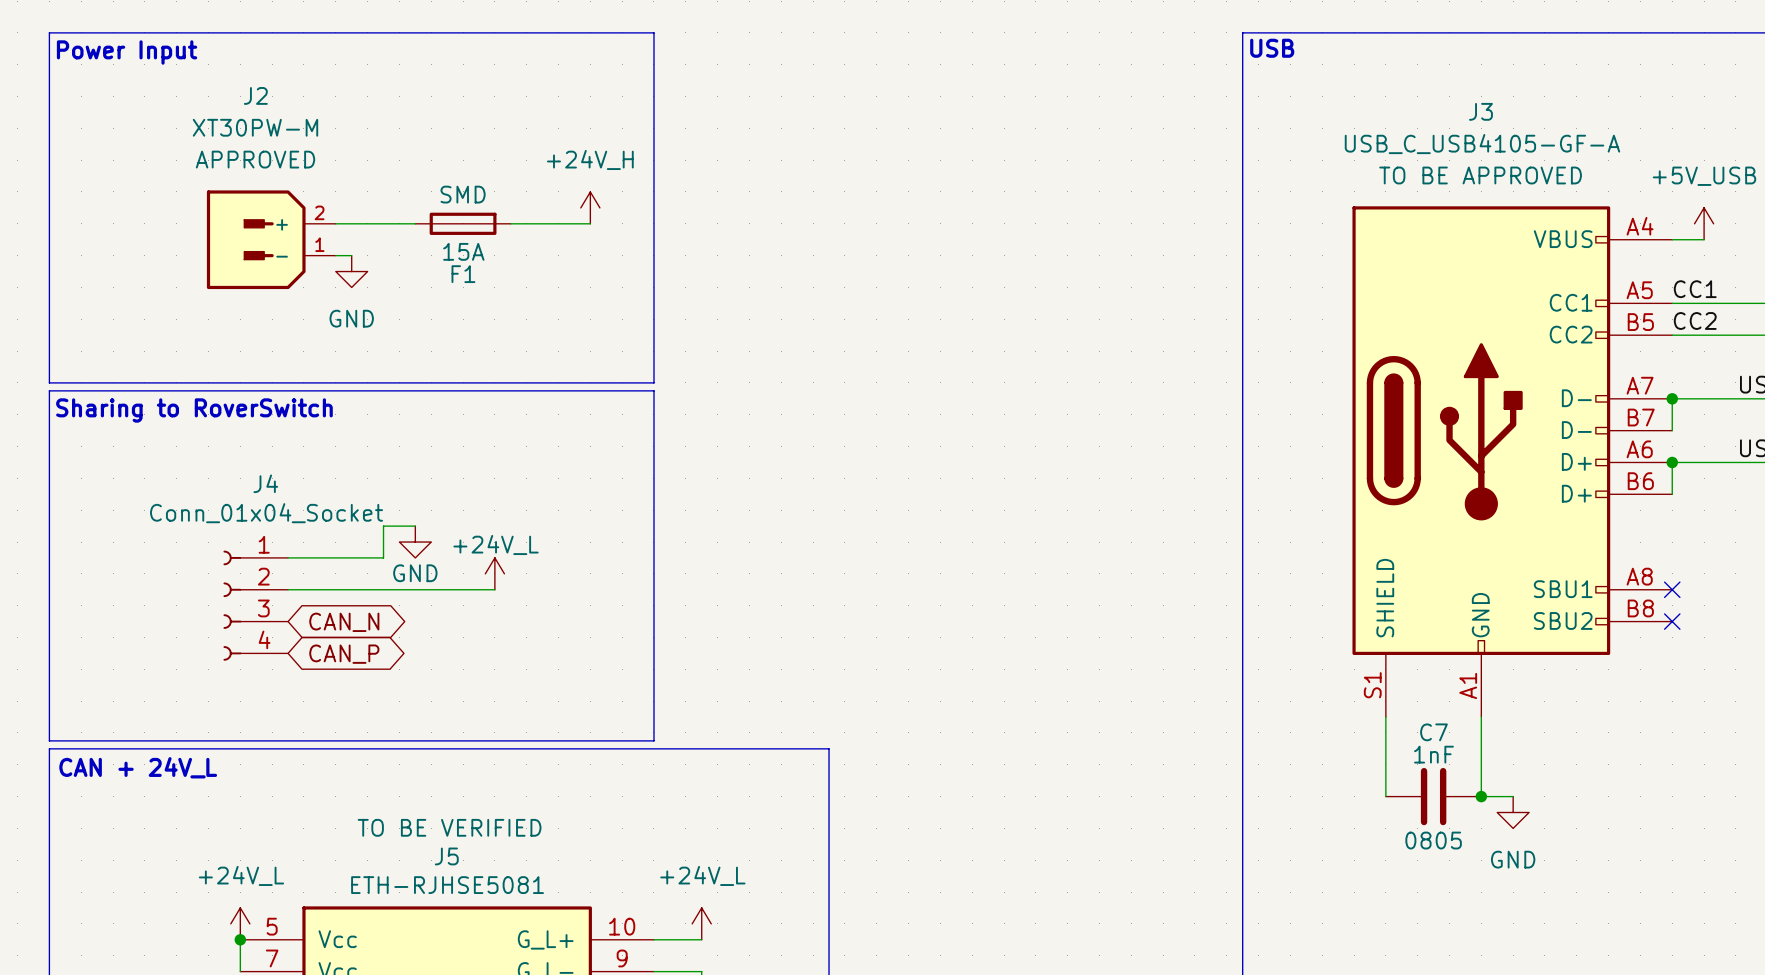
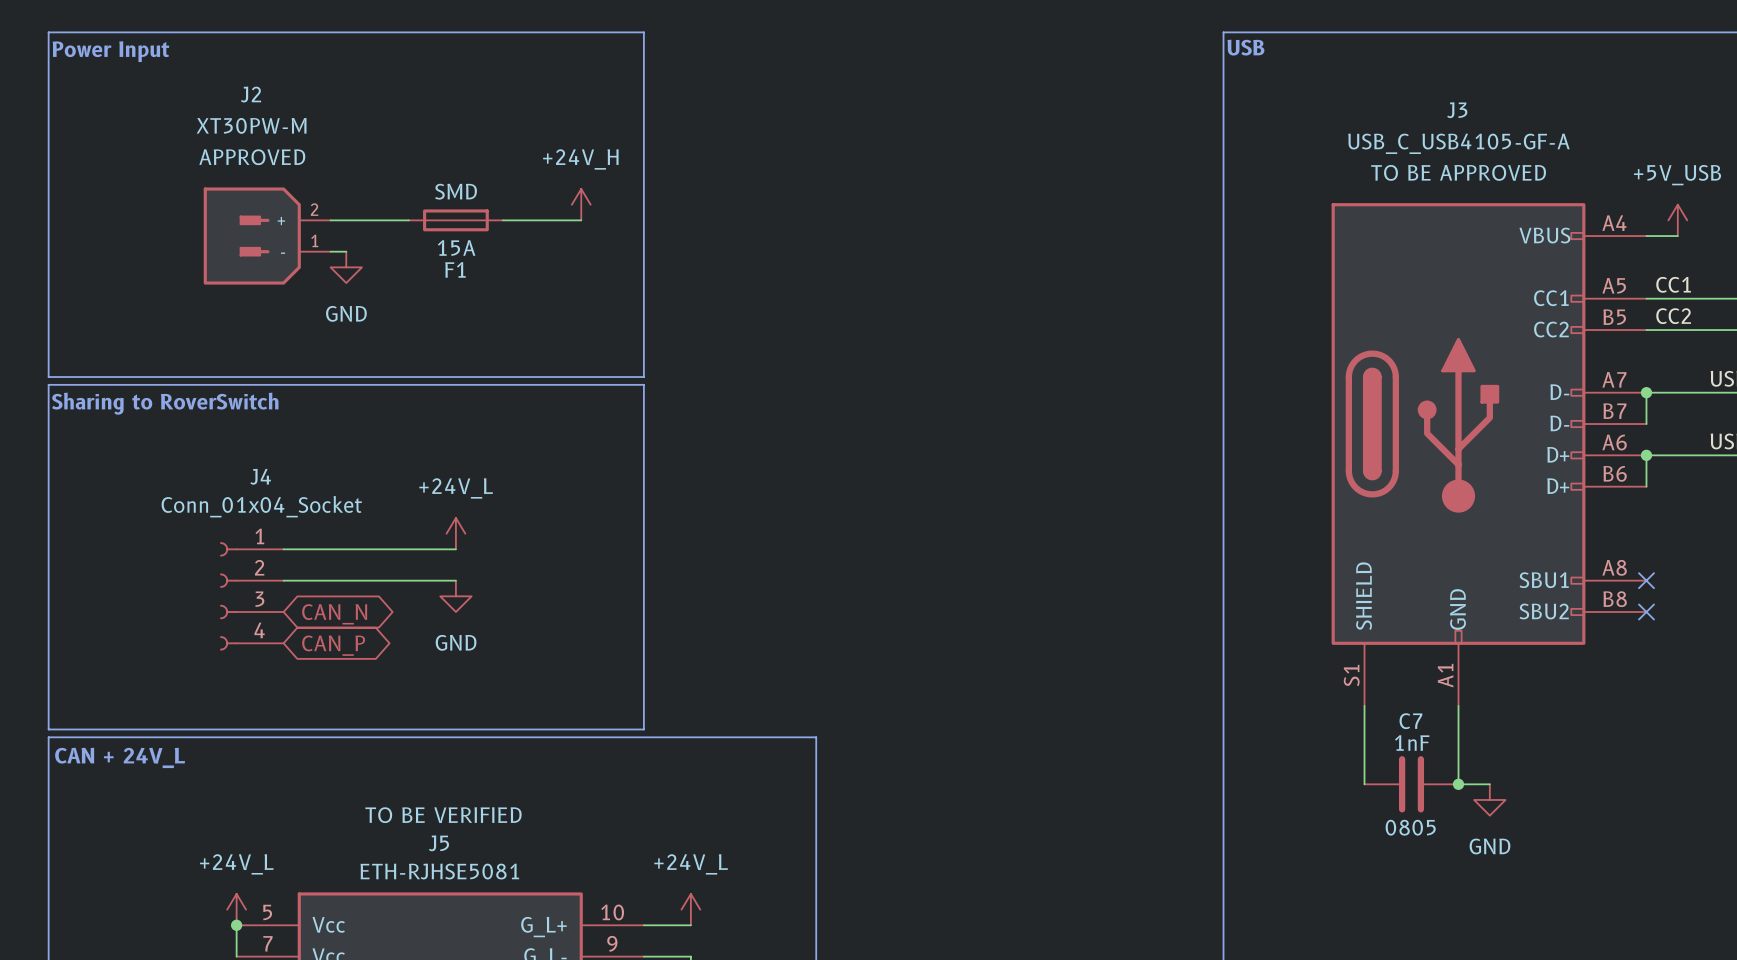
wire: (415, 526) (383, 526) (383, 557) -> (455, 549) (377, 549)
power symbol position: GND (415, 542) -> GND (455, 596)
power symbol text position: +24V_L (496, 544) -> +24V_L (456, 488)
power symbol text position: GND (415, 573) -> GND (456, 642)
power symbol position: +24V_L (494, 573) -> +24V_L (455, 533)
wire: (463, 589) (494, 589) -> none

